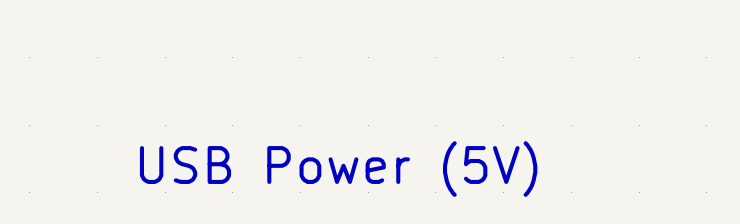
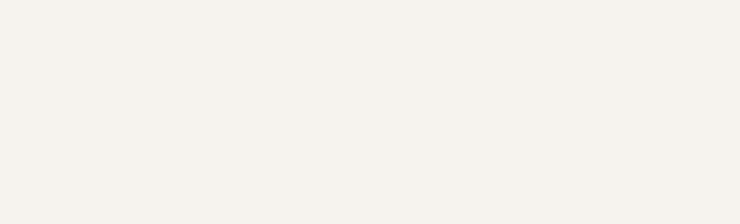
text: USB Power (5V) (338, 169) -> none

